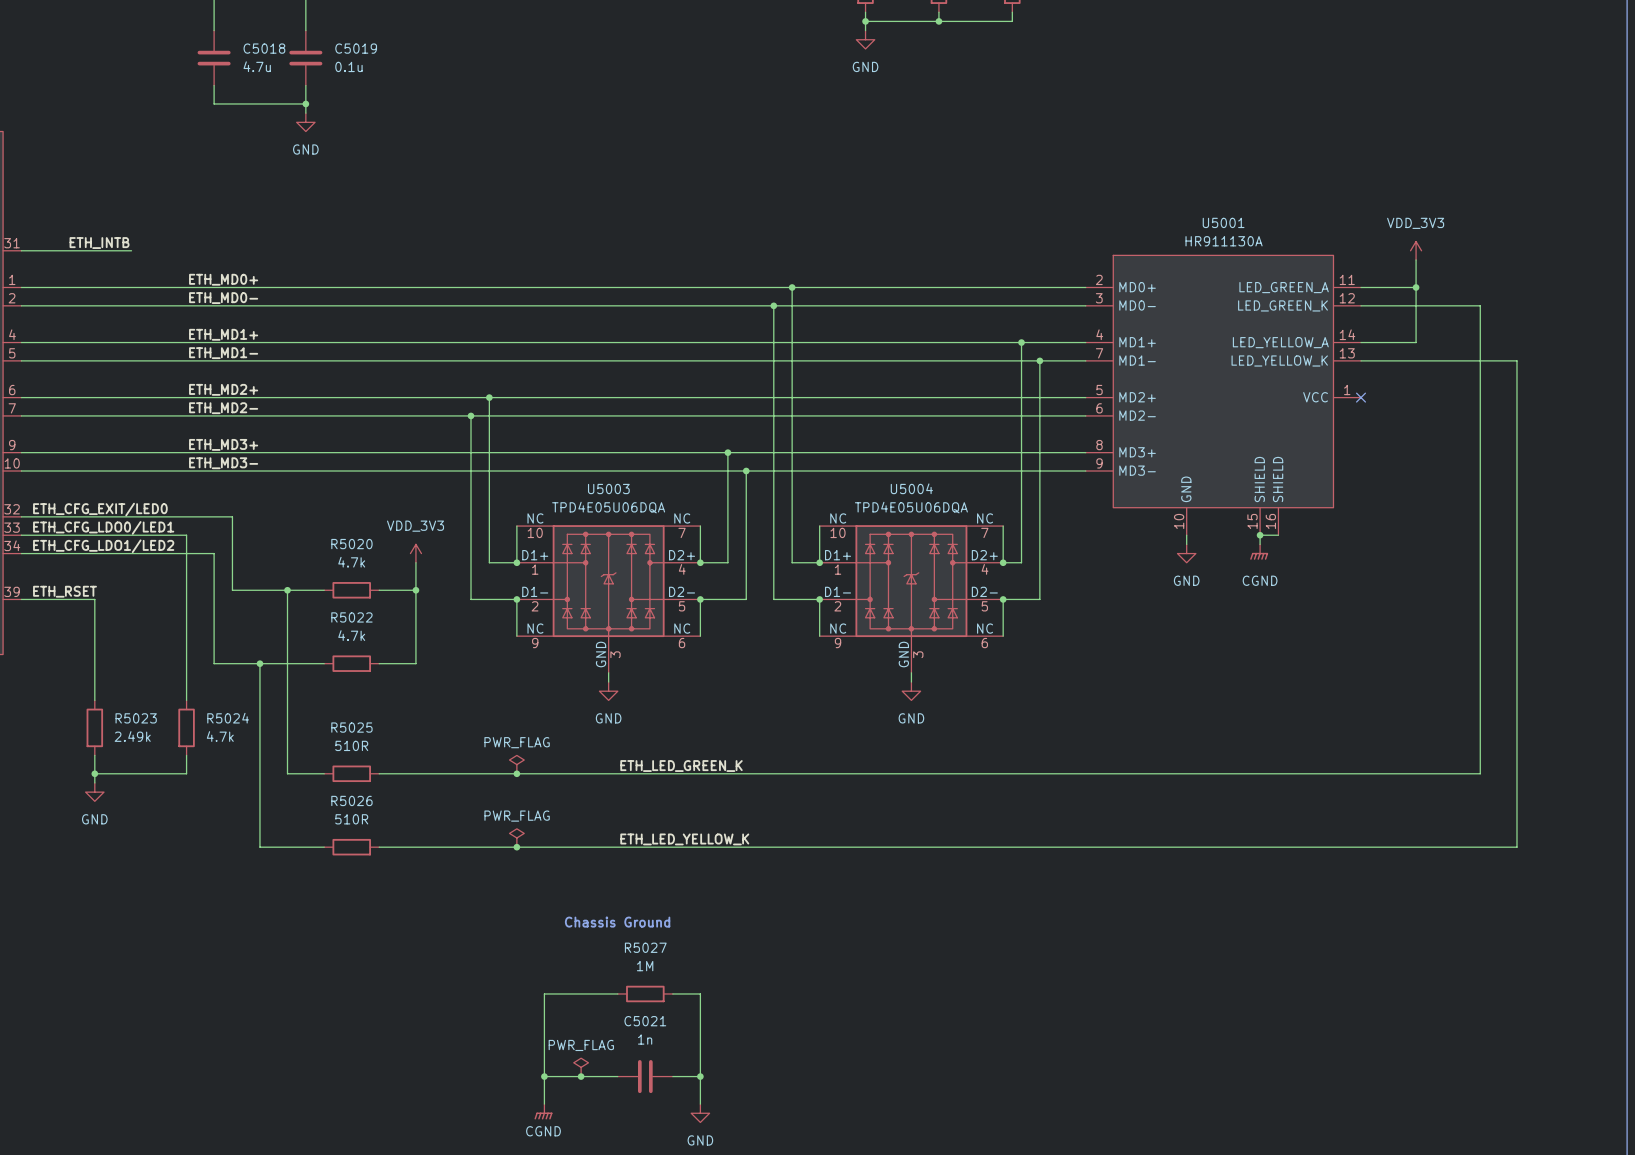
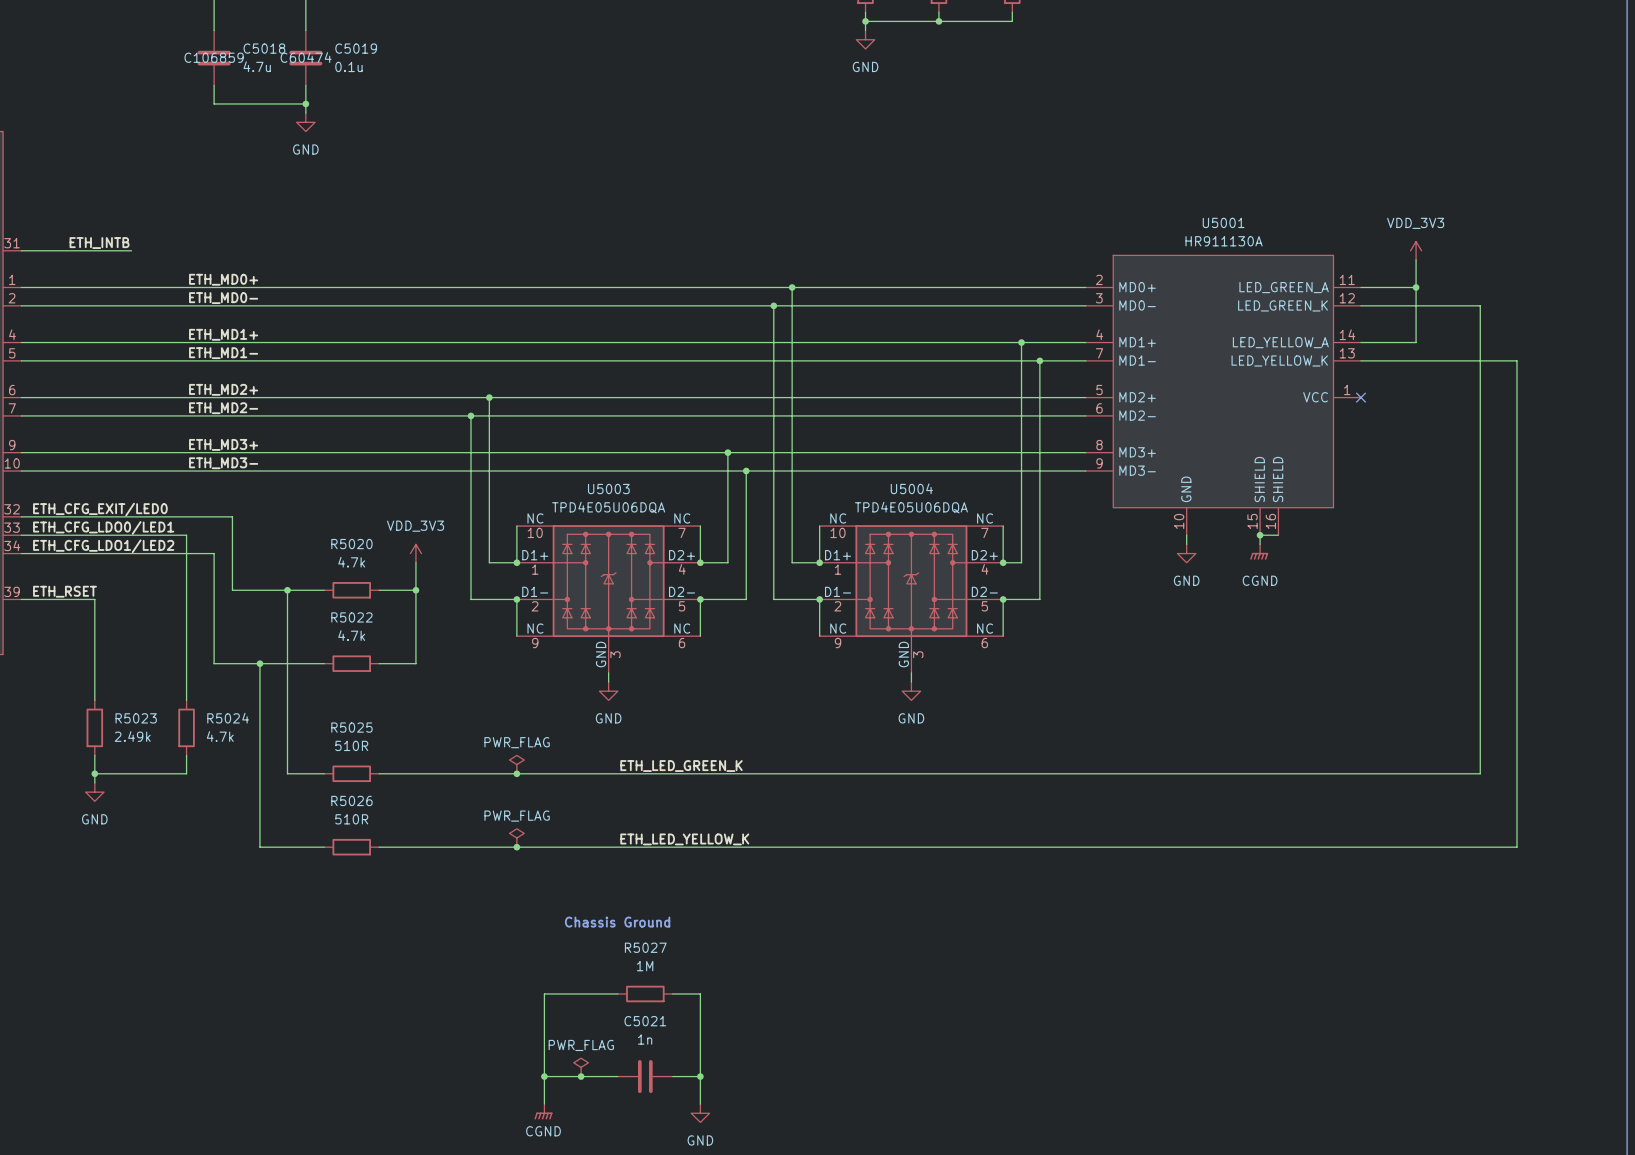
C5018 text: none -> C106859 (214, 57)
C5019 text: none -> C60474 (306, 57)

